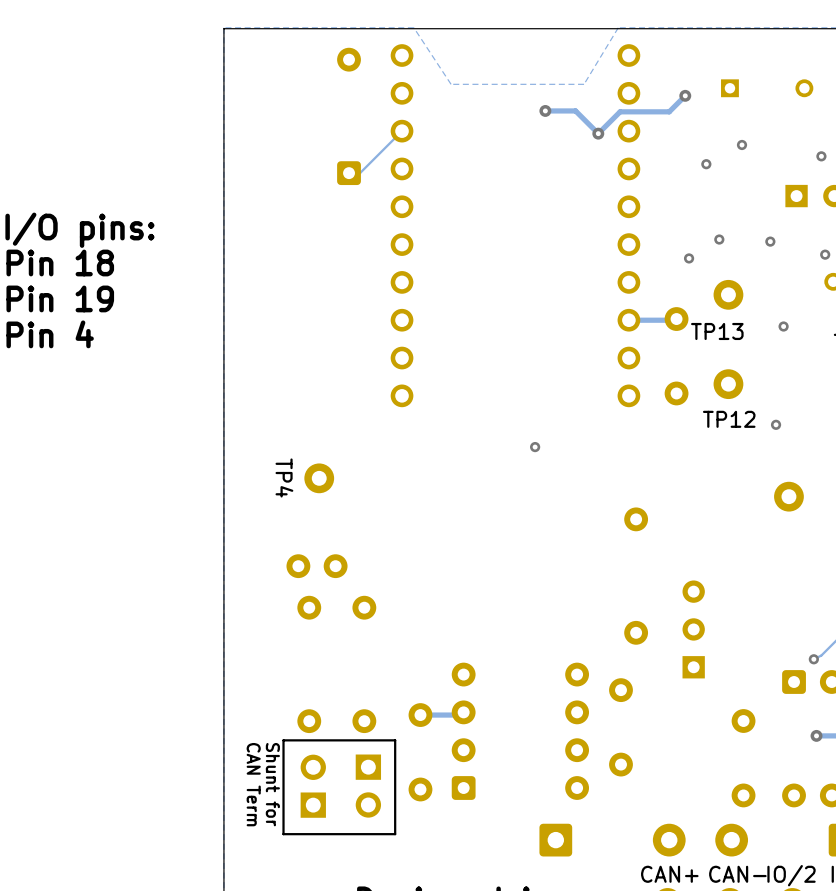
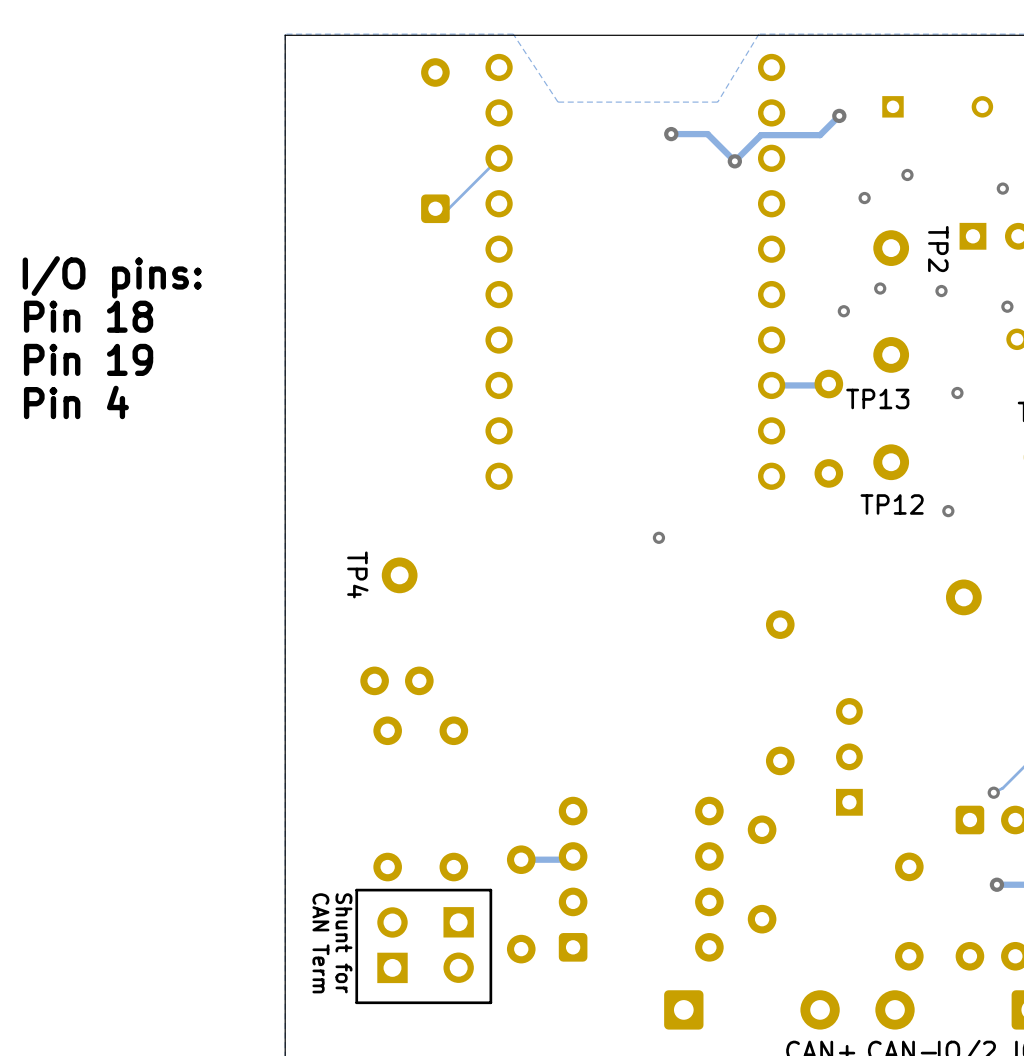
TP2: none -> (891, 248)

